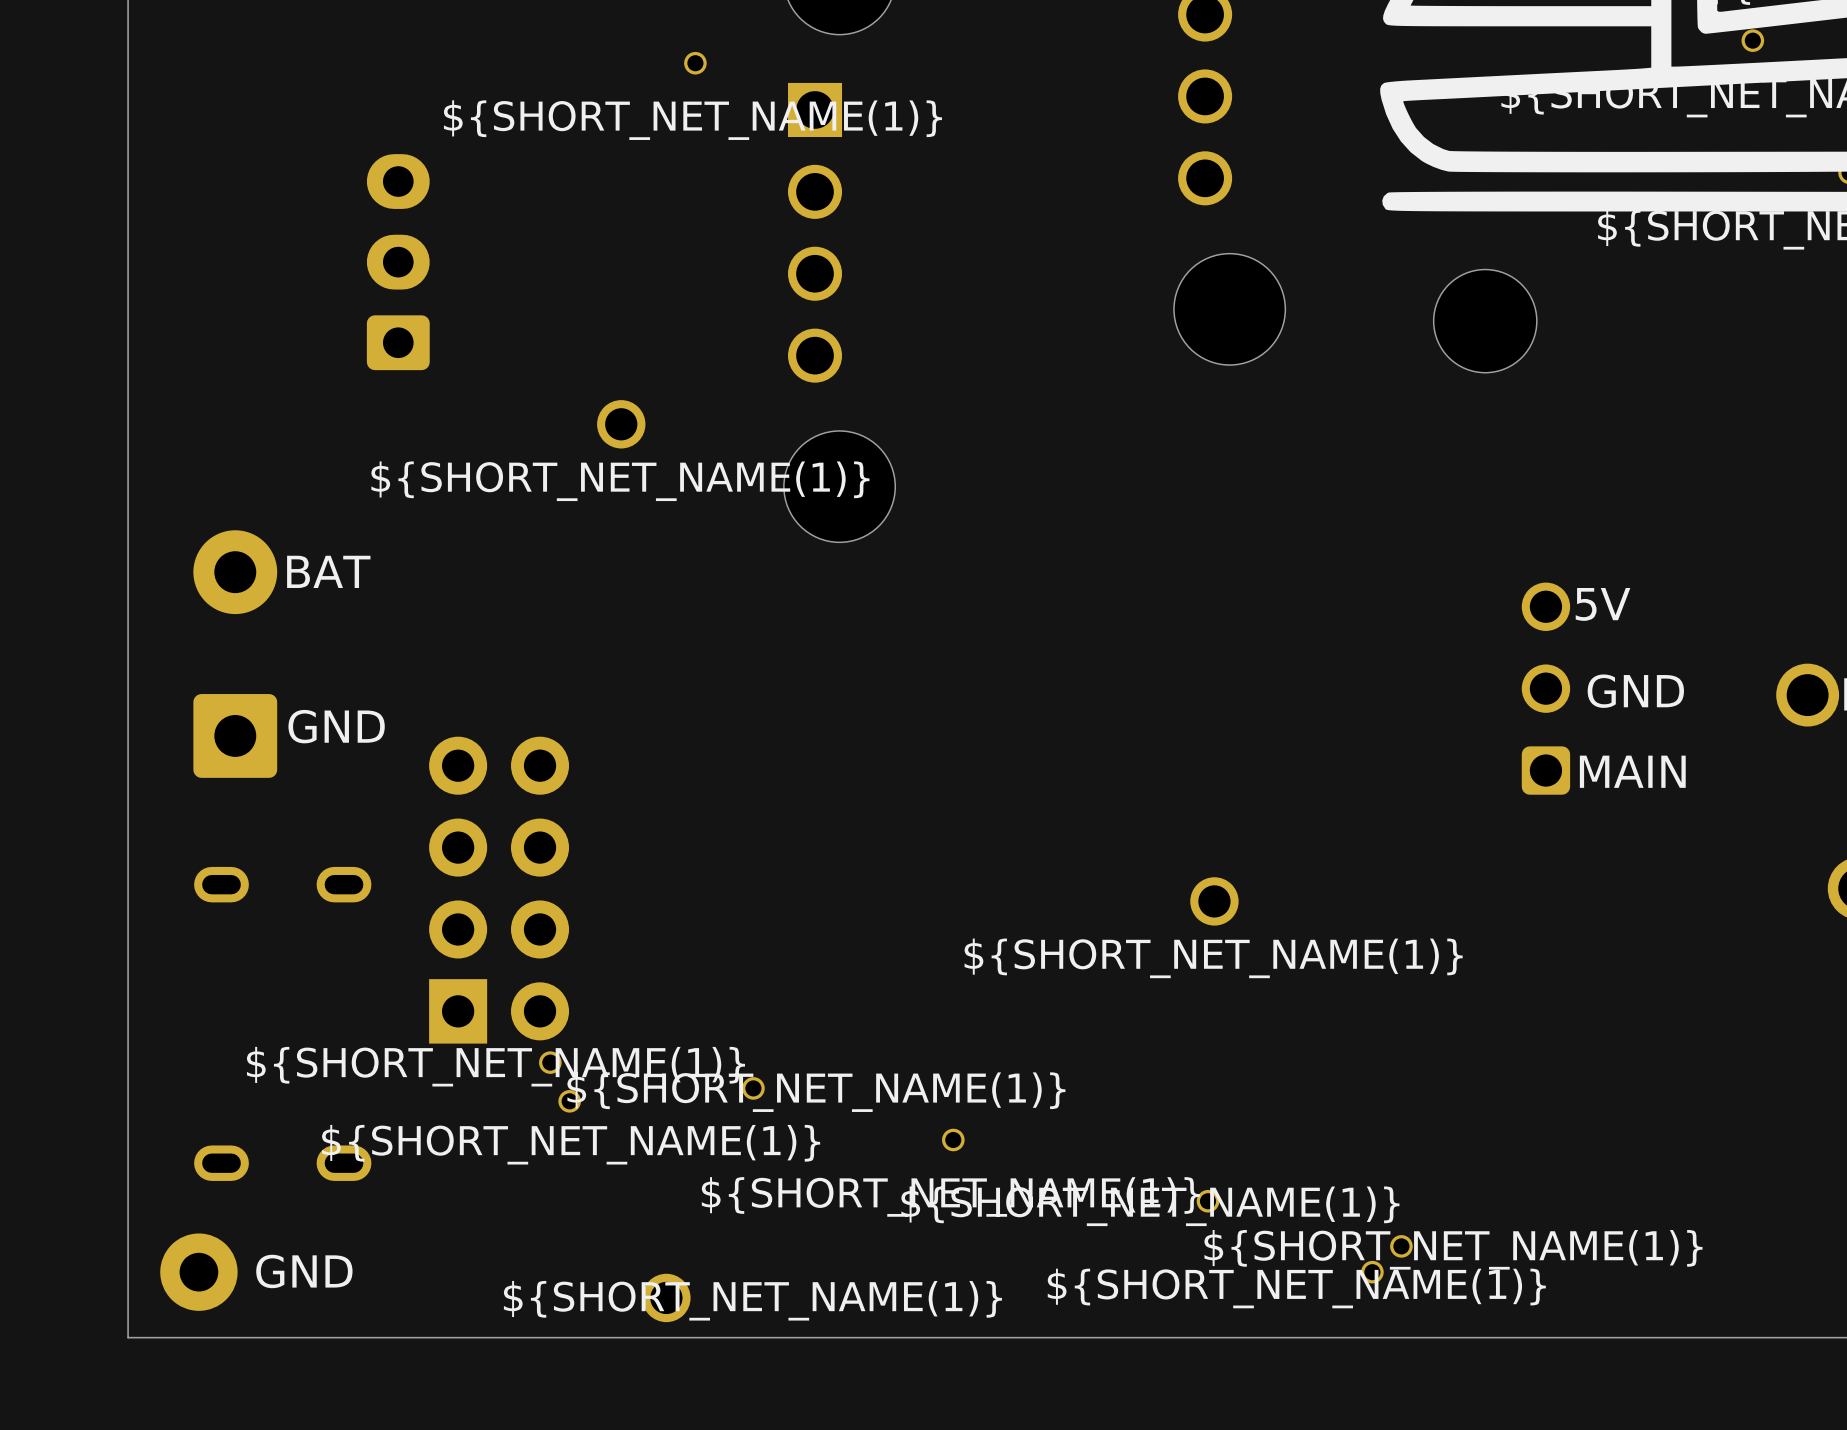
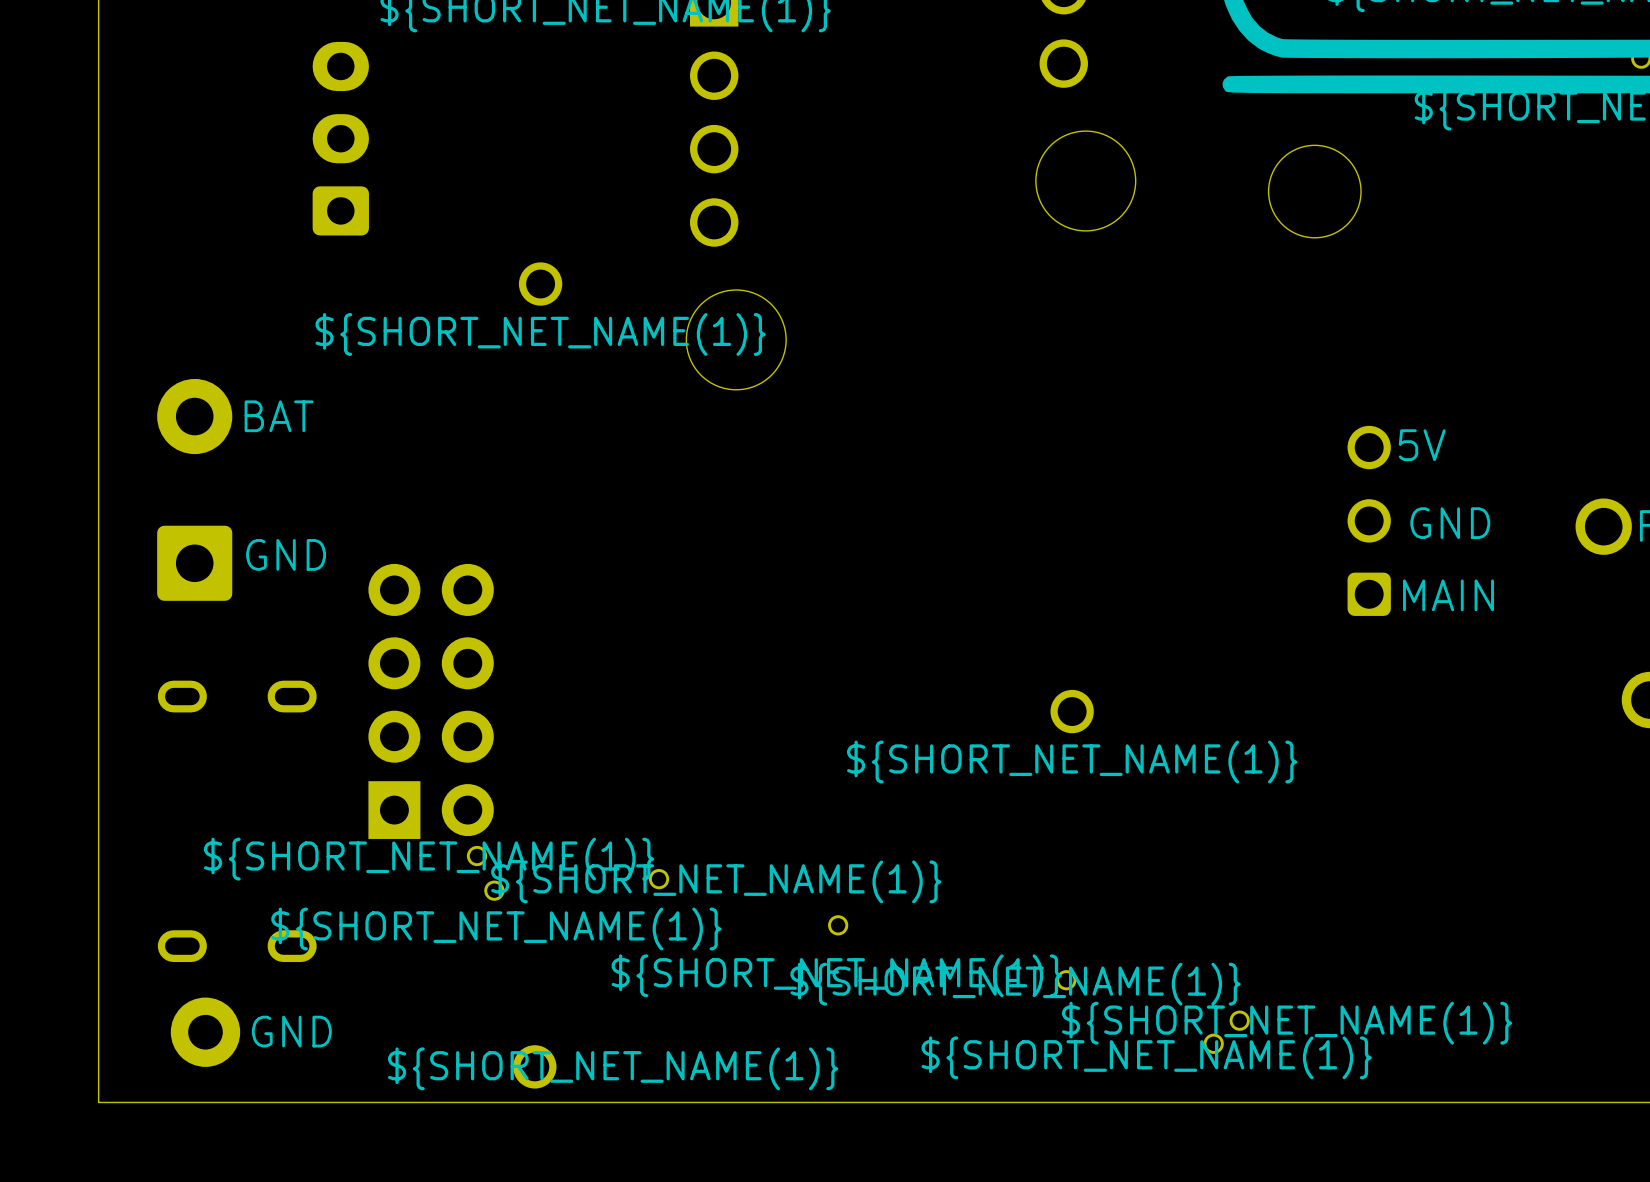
text position: GND (304, 1271) -> GND (291, 1031)
part position: (198, 1272) -> (205, 1032)
part position: (666, 1297) -> (534, 1066)

